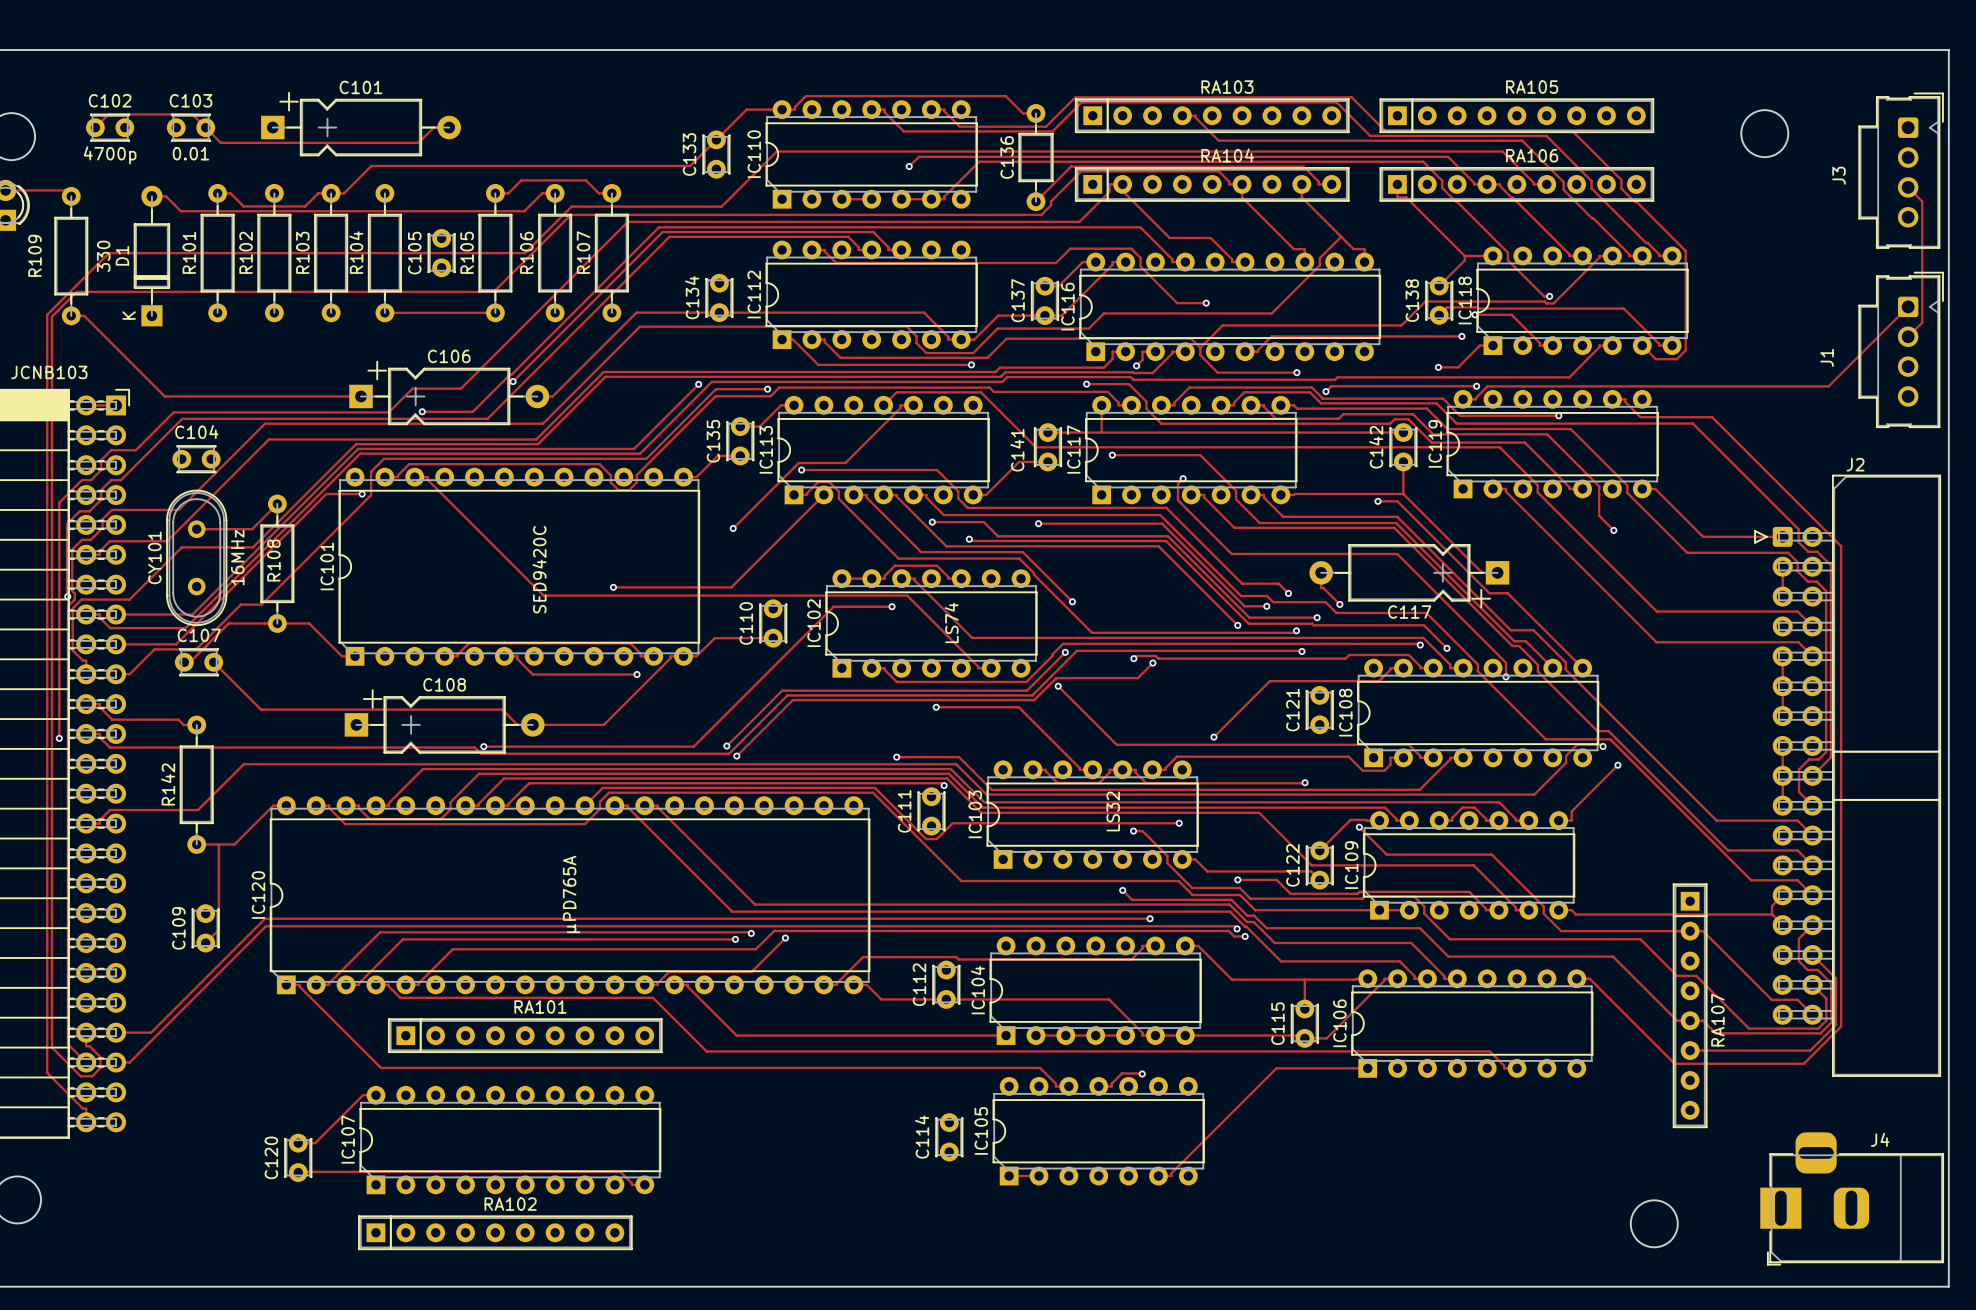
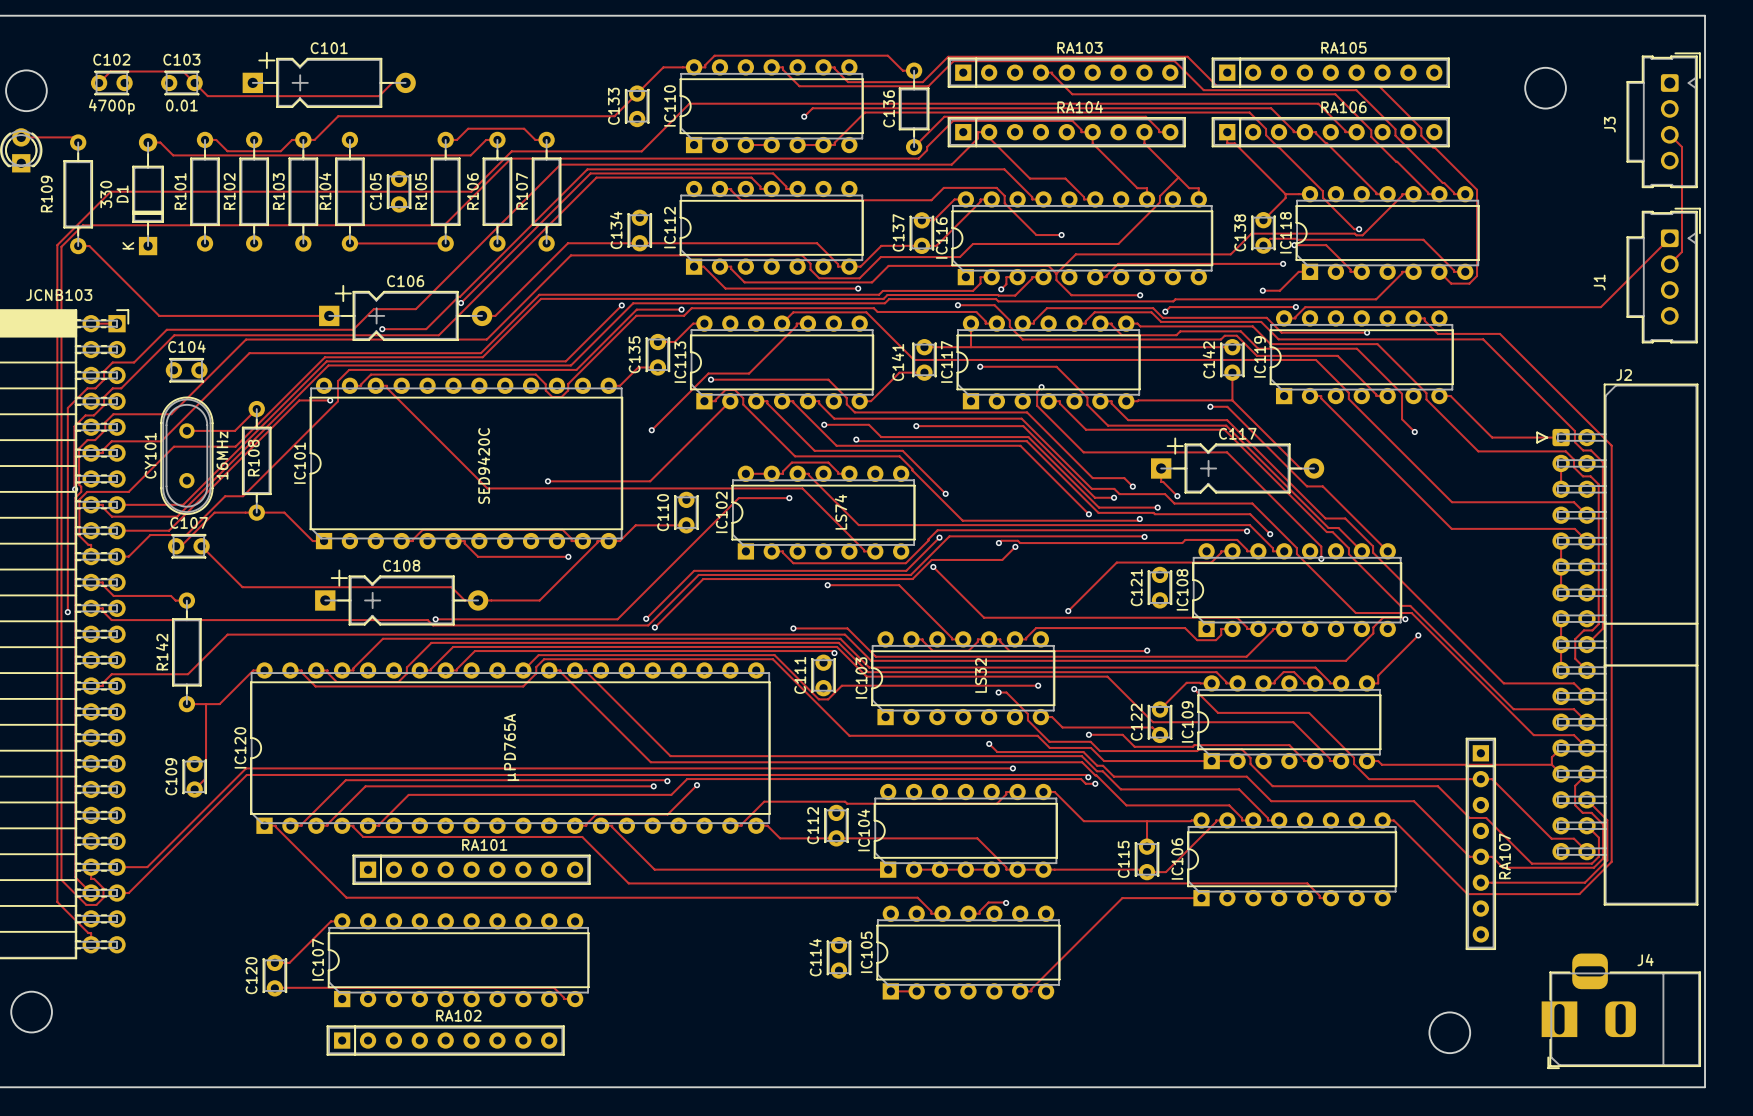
C117 rotation: 0° (1409, 576) -> 180° (1237, 465)

